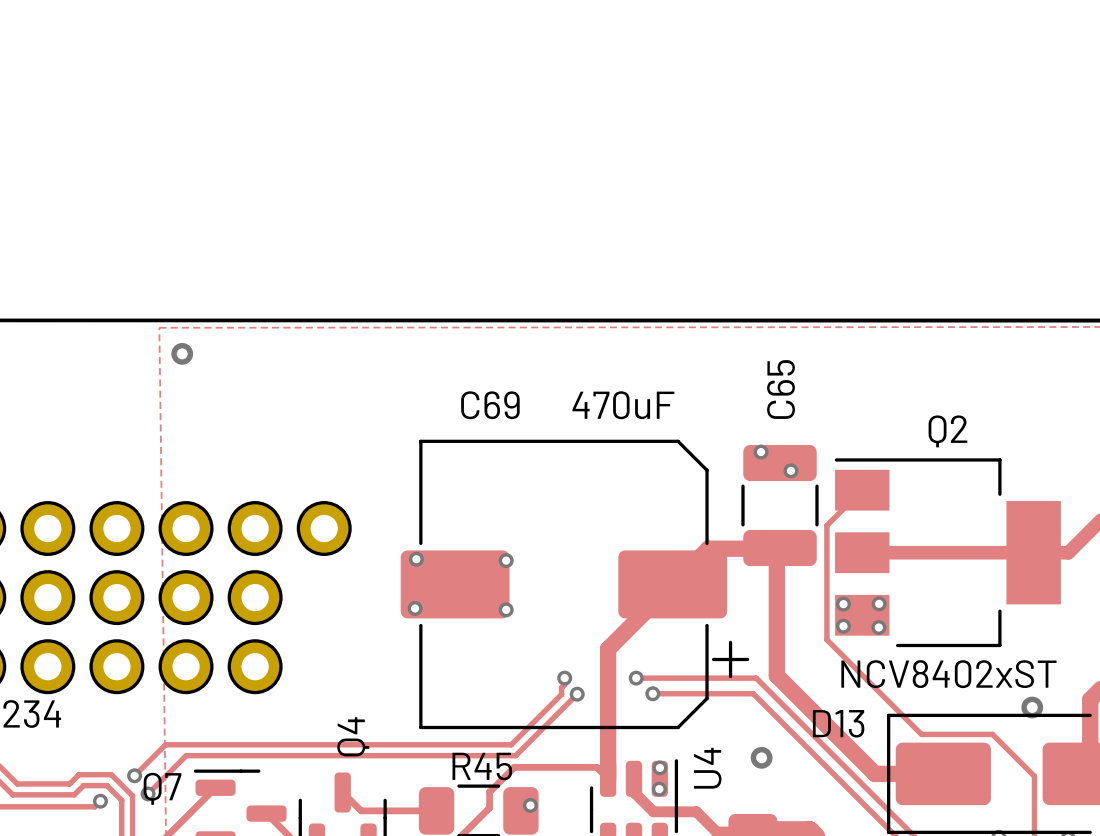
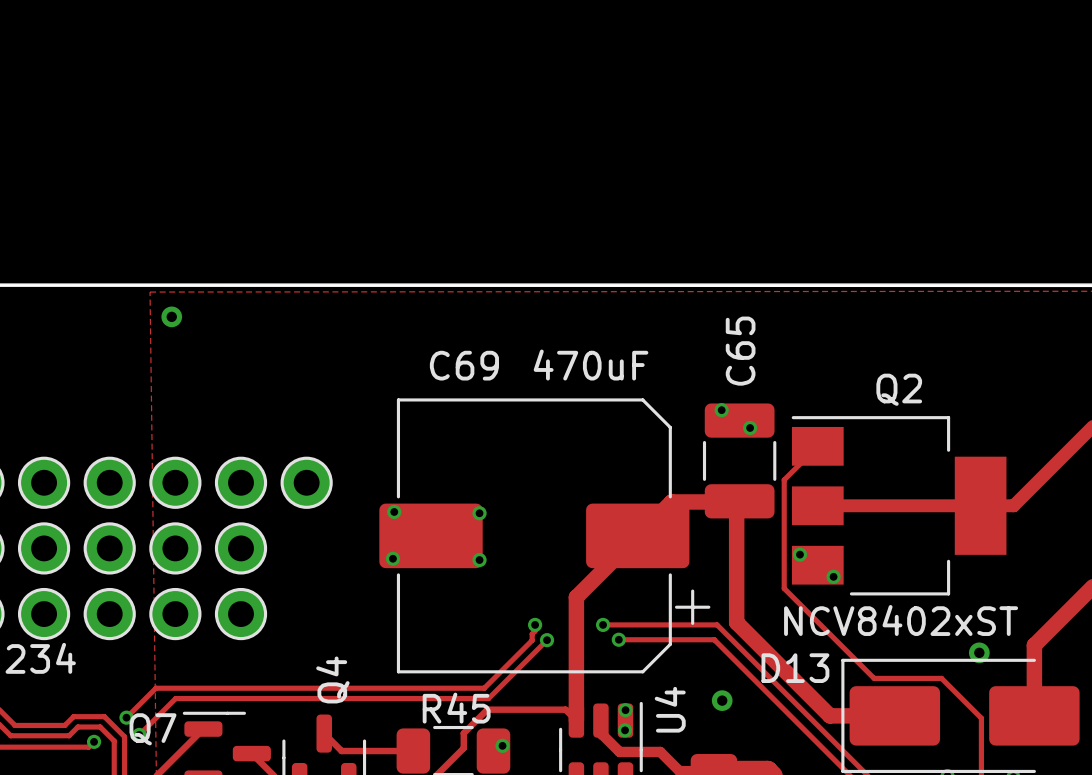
via: (879, 603) -> none
via: (843, 626) -> none

